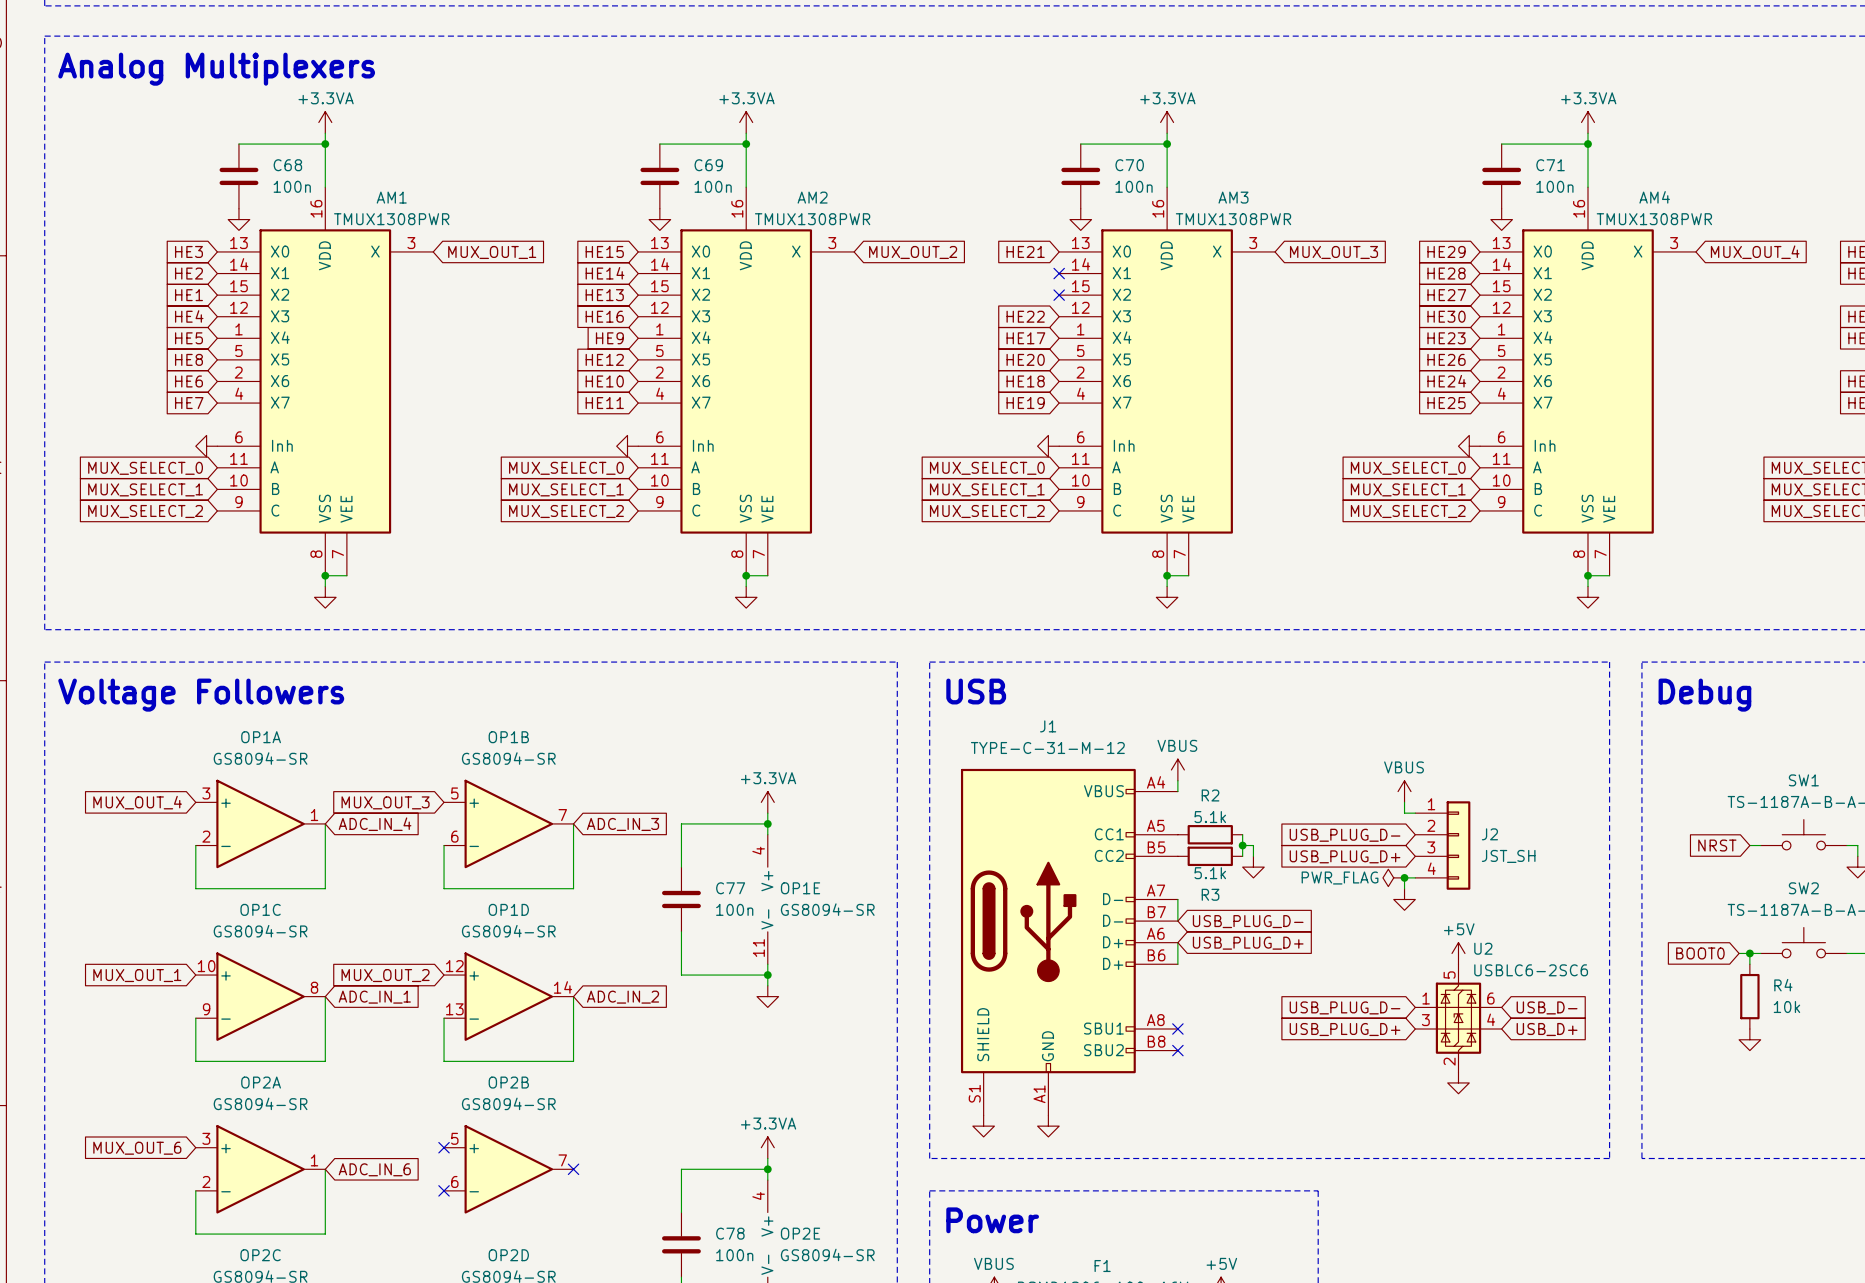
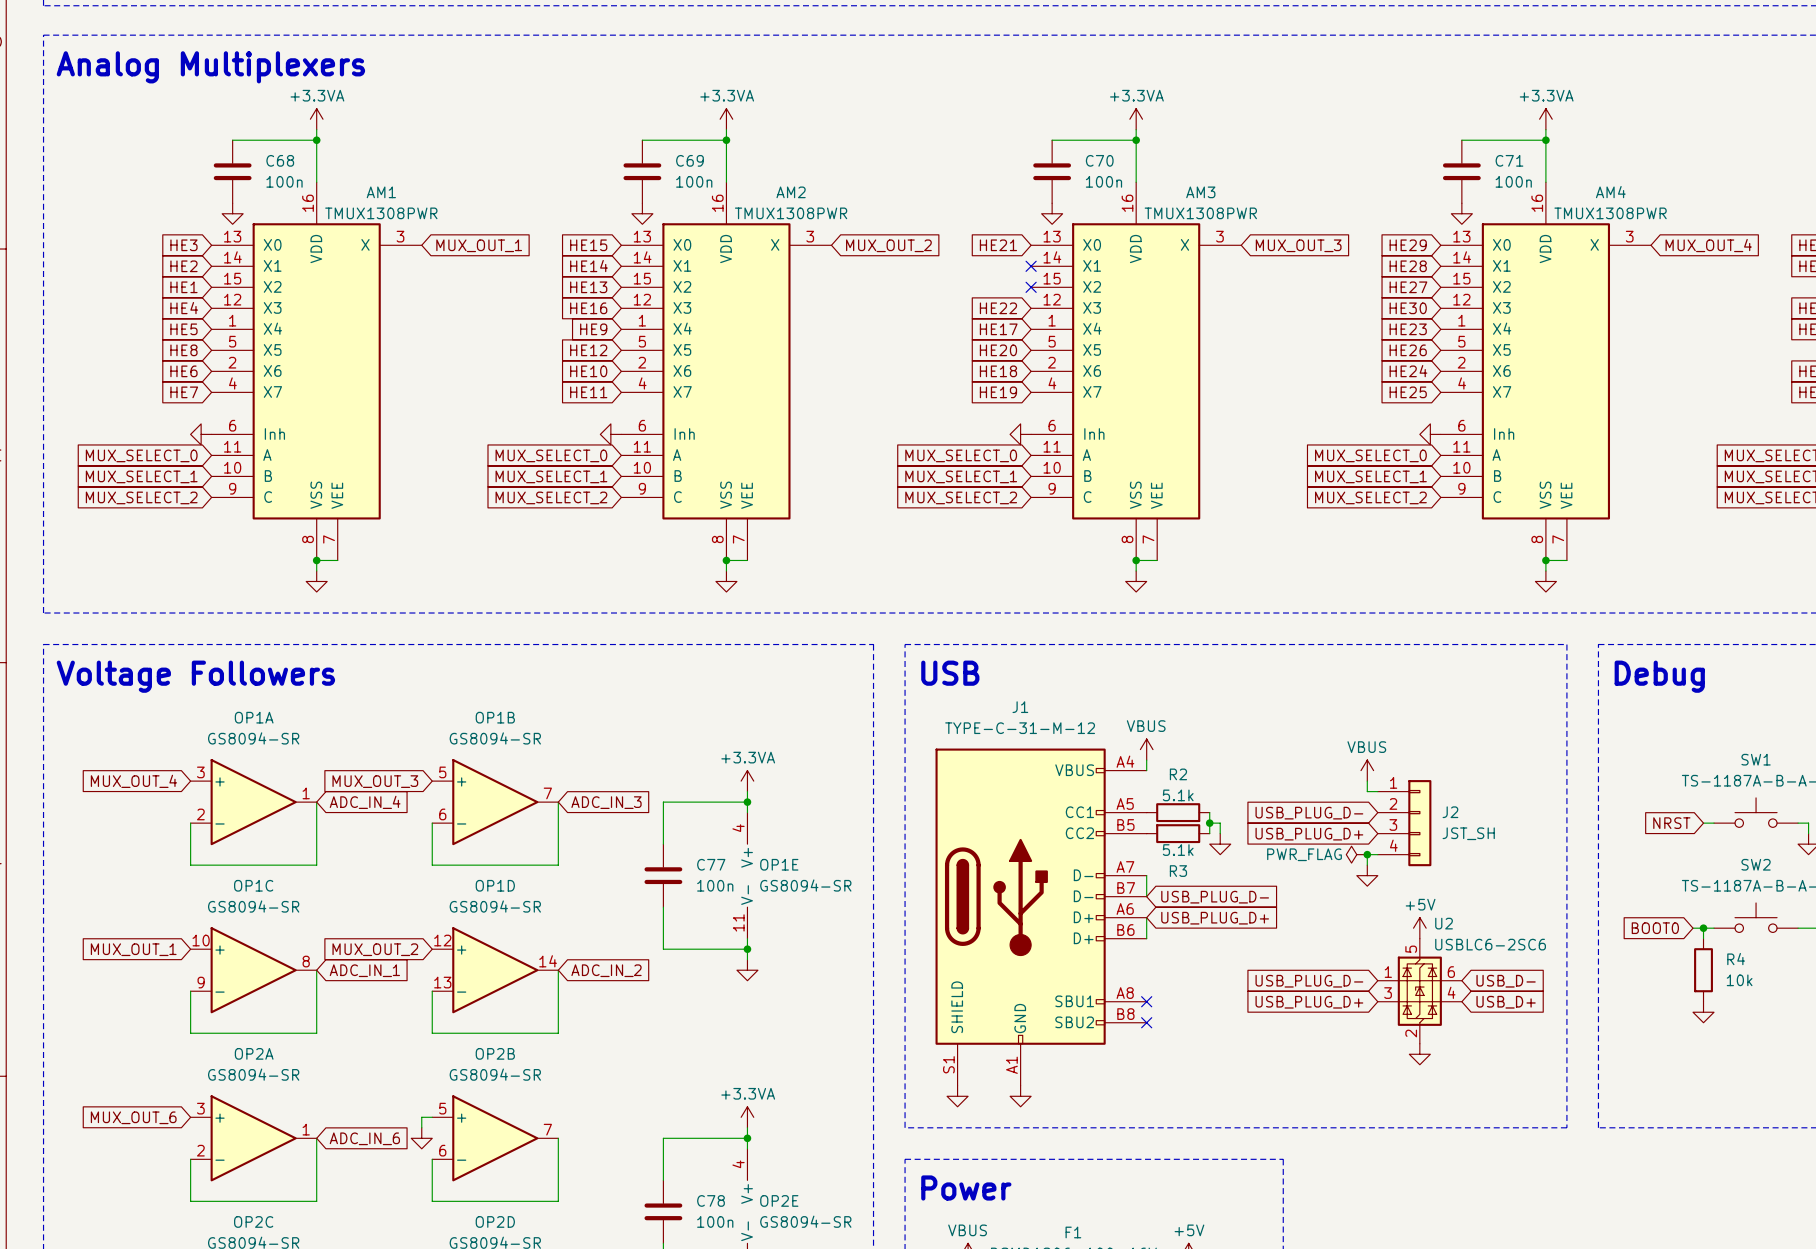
wire: none -> (432, 1117) (421, 1117) (421, 1127)
no-connect mark: (444, 1147) -> none
power symbol: none -> (421, 1138)
wire: none -> (558, 1138) (558, 1201) (432, 1201) (432, 1159)
no-connect mark: (573, 1169) -> none
no-connect mark: (444, 1190) -> none

